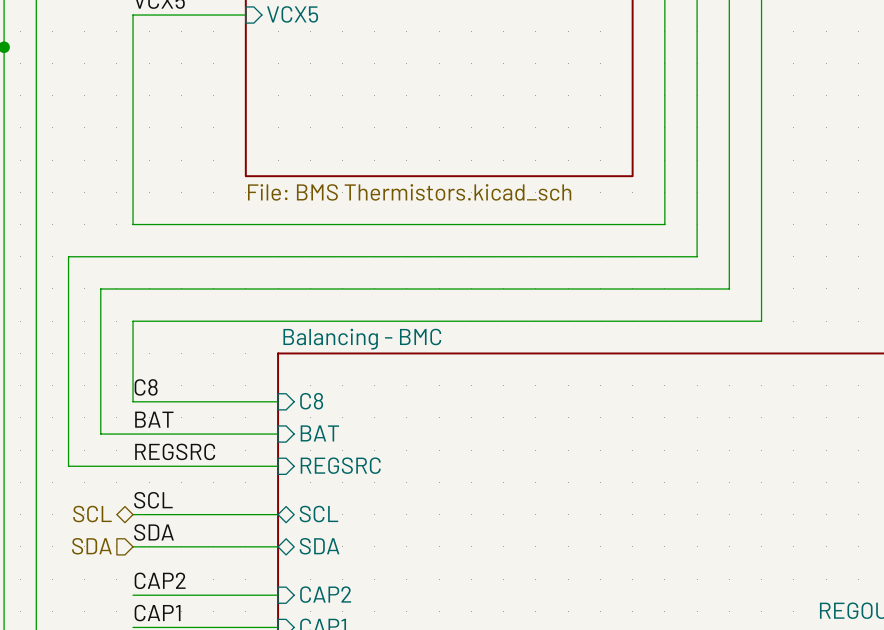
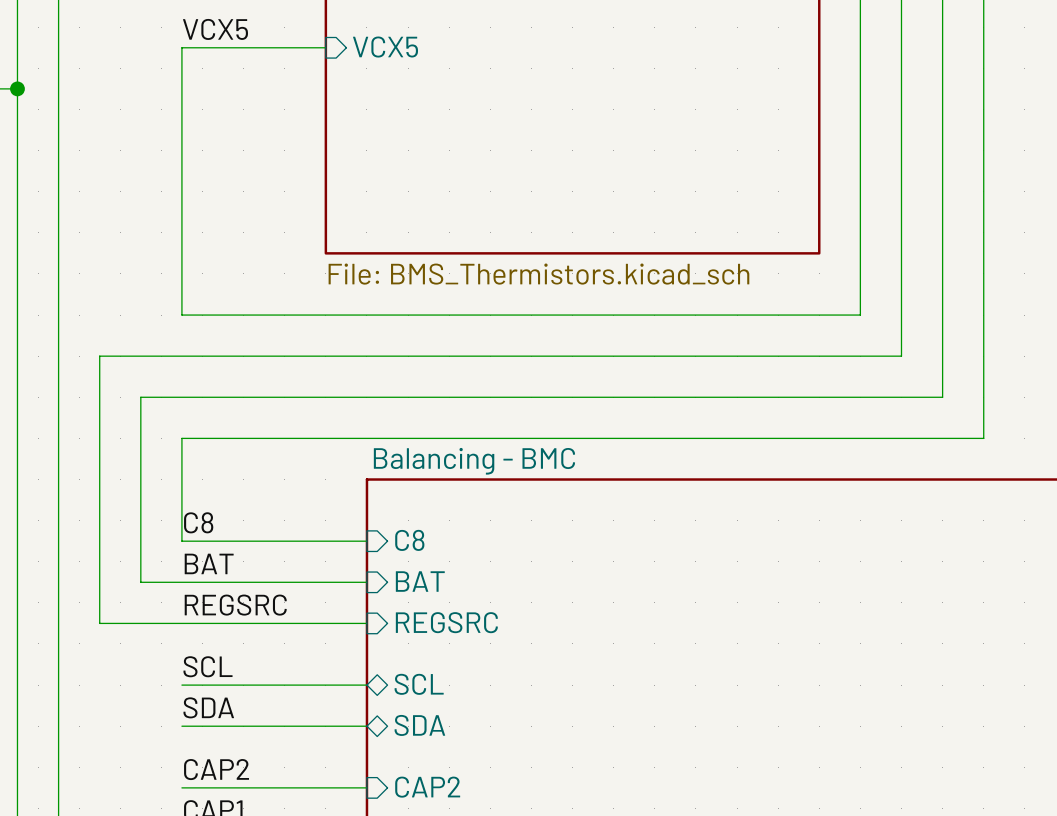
sheet value: File: BMS Thermistors.kicad_sch (409, 192) -> File: BMS_Thermistors.kicad_sch (538, 274)
hierarchical label: SCL (92, 514) -> none
hierarchical label: SDA (91, 546) -> none

